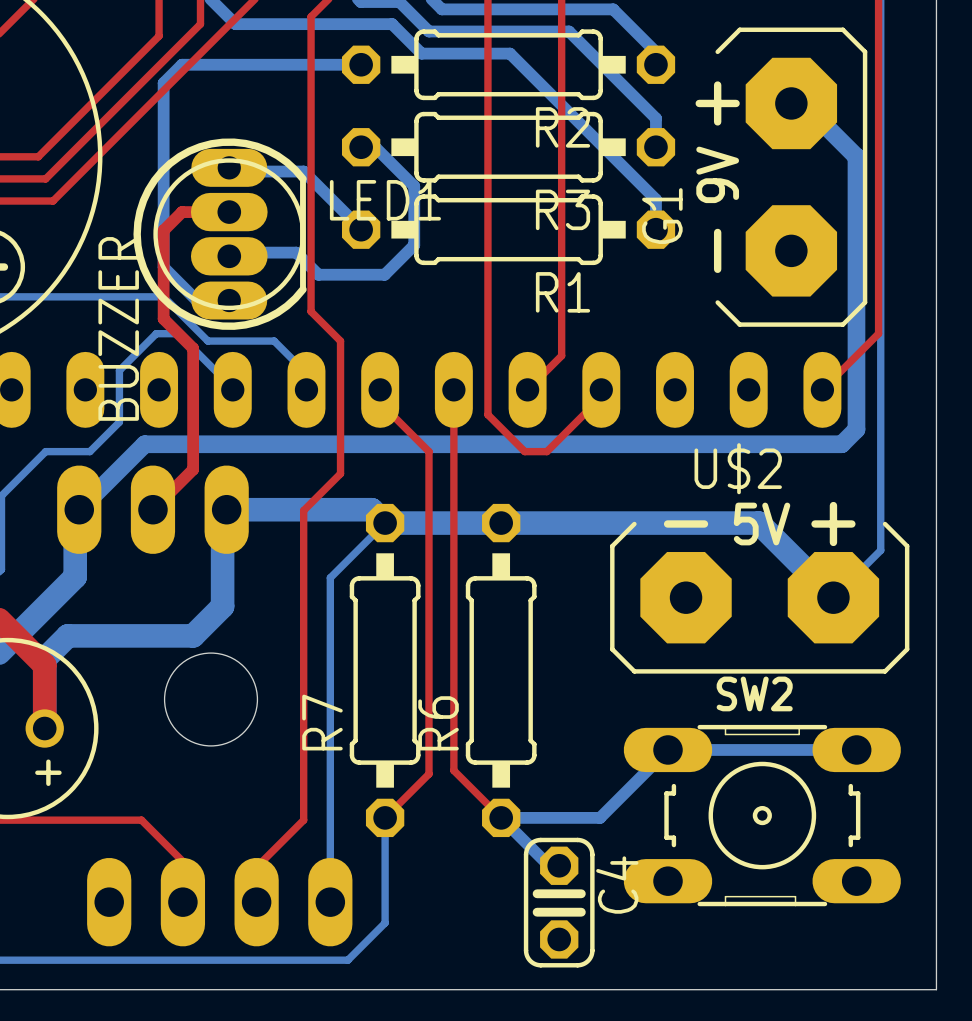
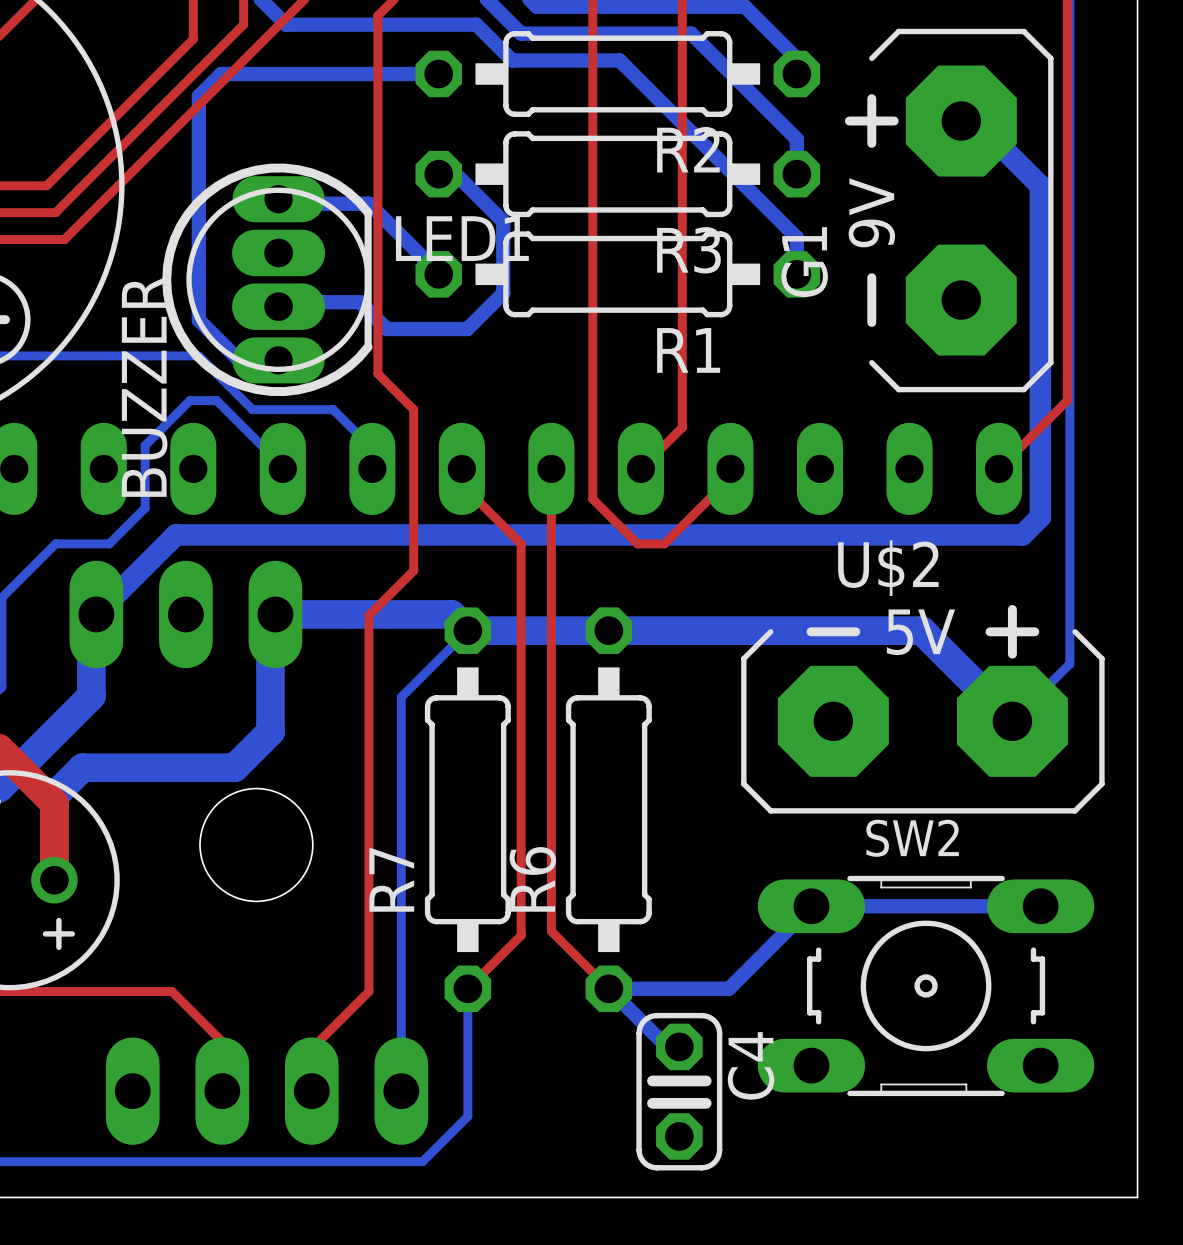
top track: (229, 212) (182, 212) (163, 230) (163, 318) (193, 348) (193, 469) (152, 509) -> none

